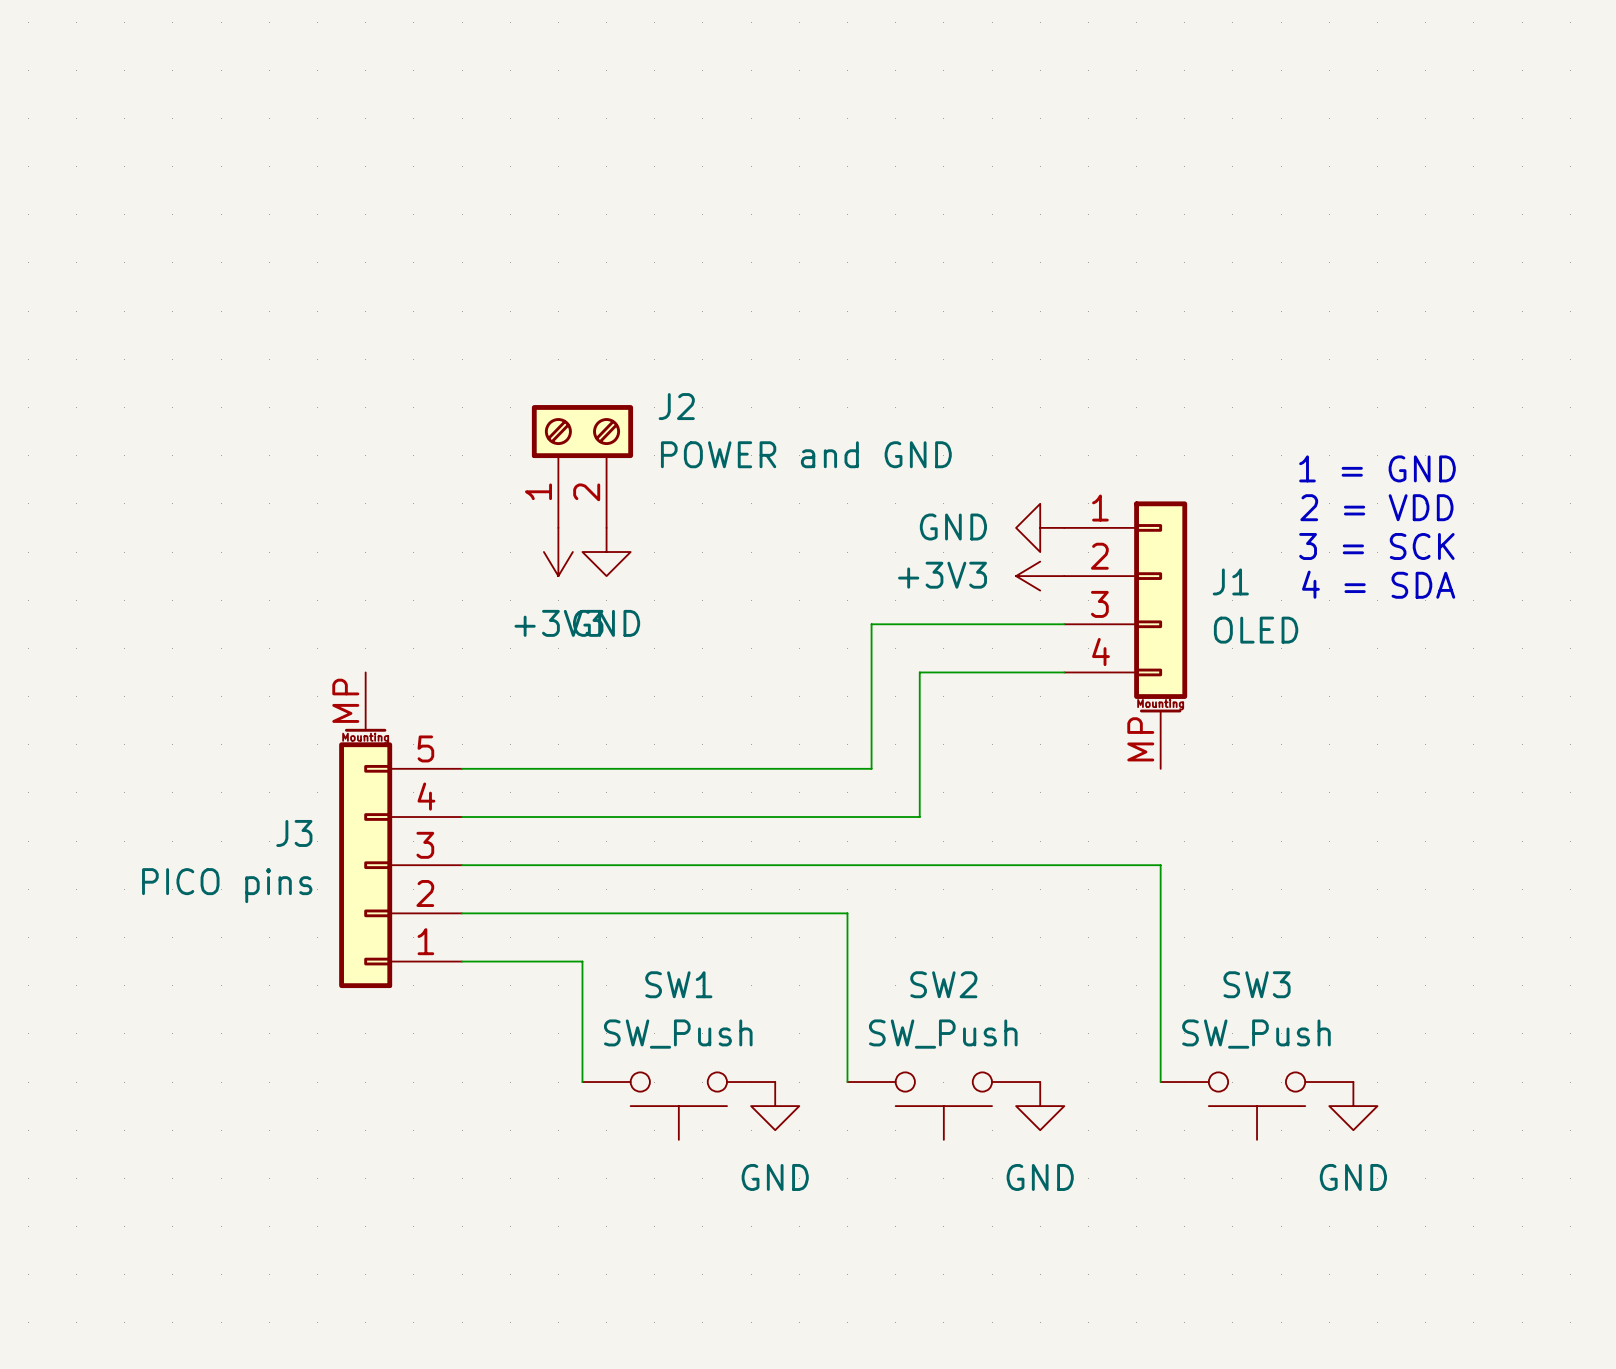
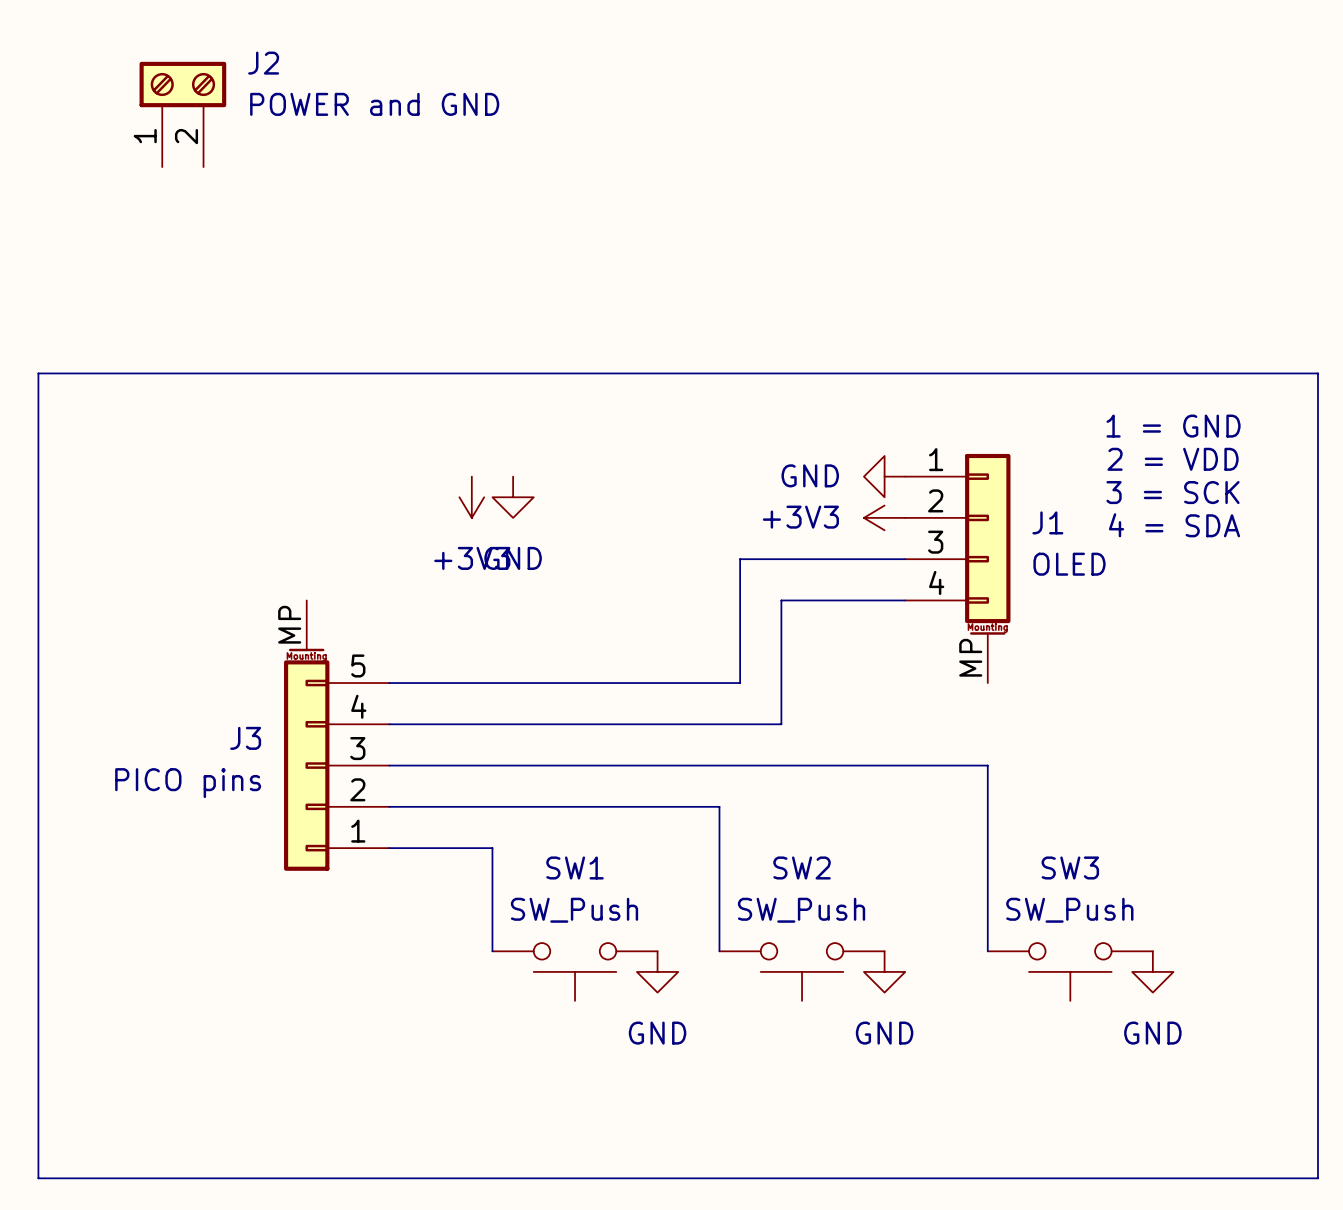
line: none -> (38, 373) (1317, 373) (1317, 1178) (38, 1178) (38, 373)
J2 position: (582, 466) -> (182, 114)

